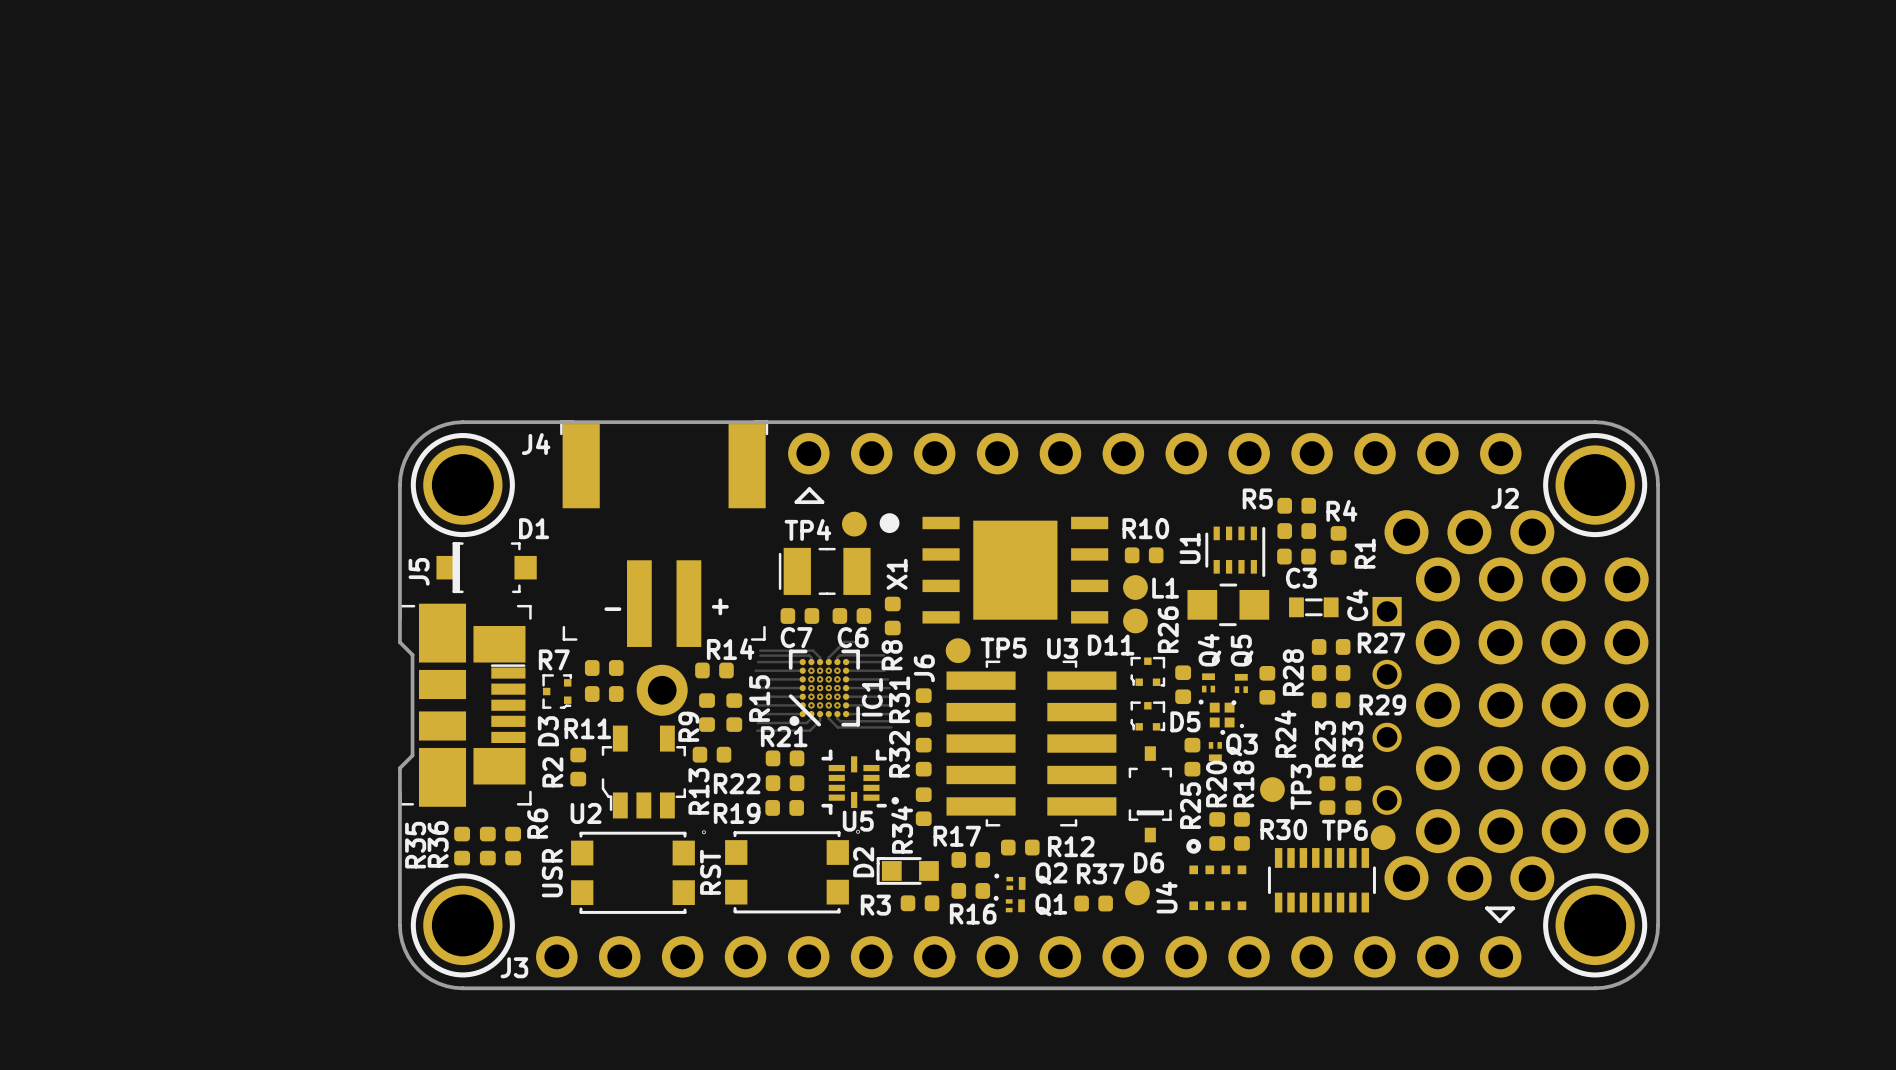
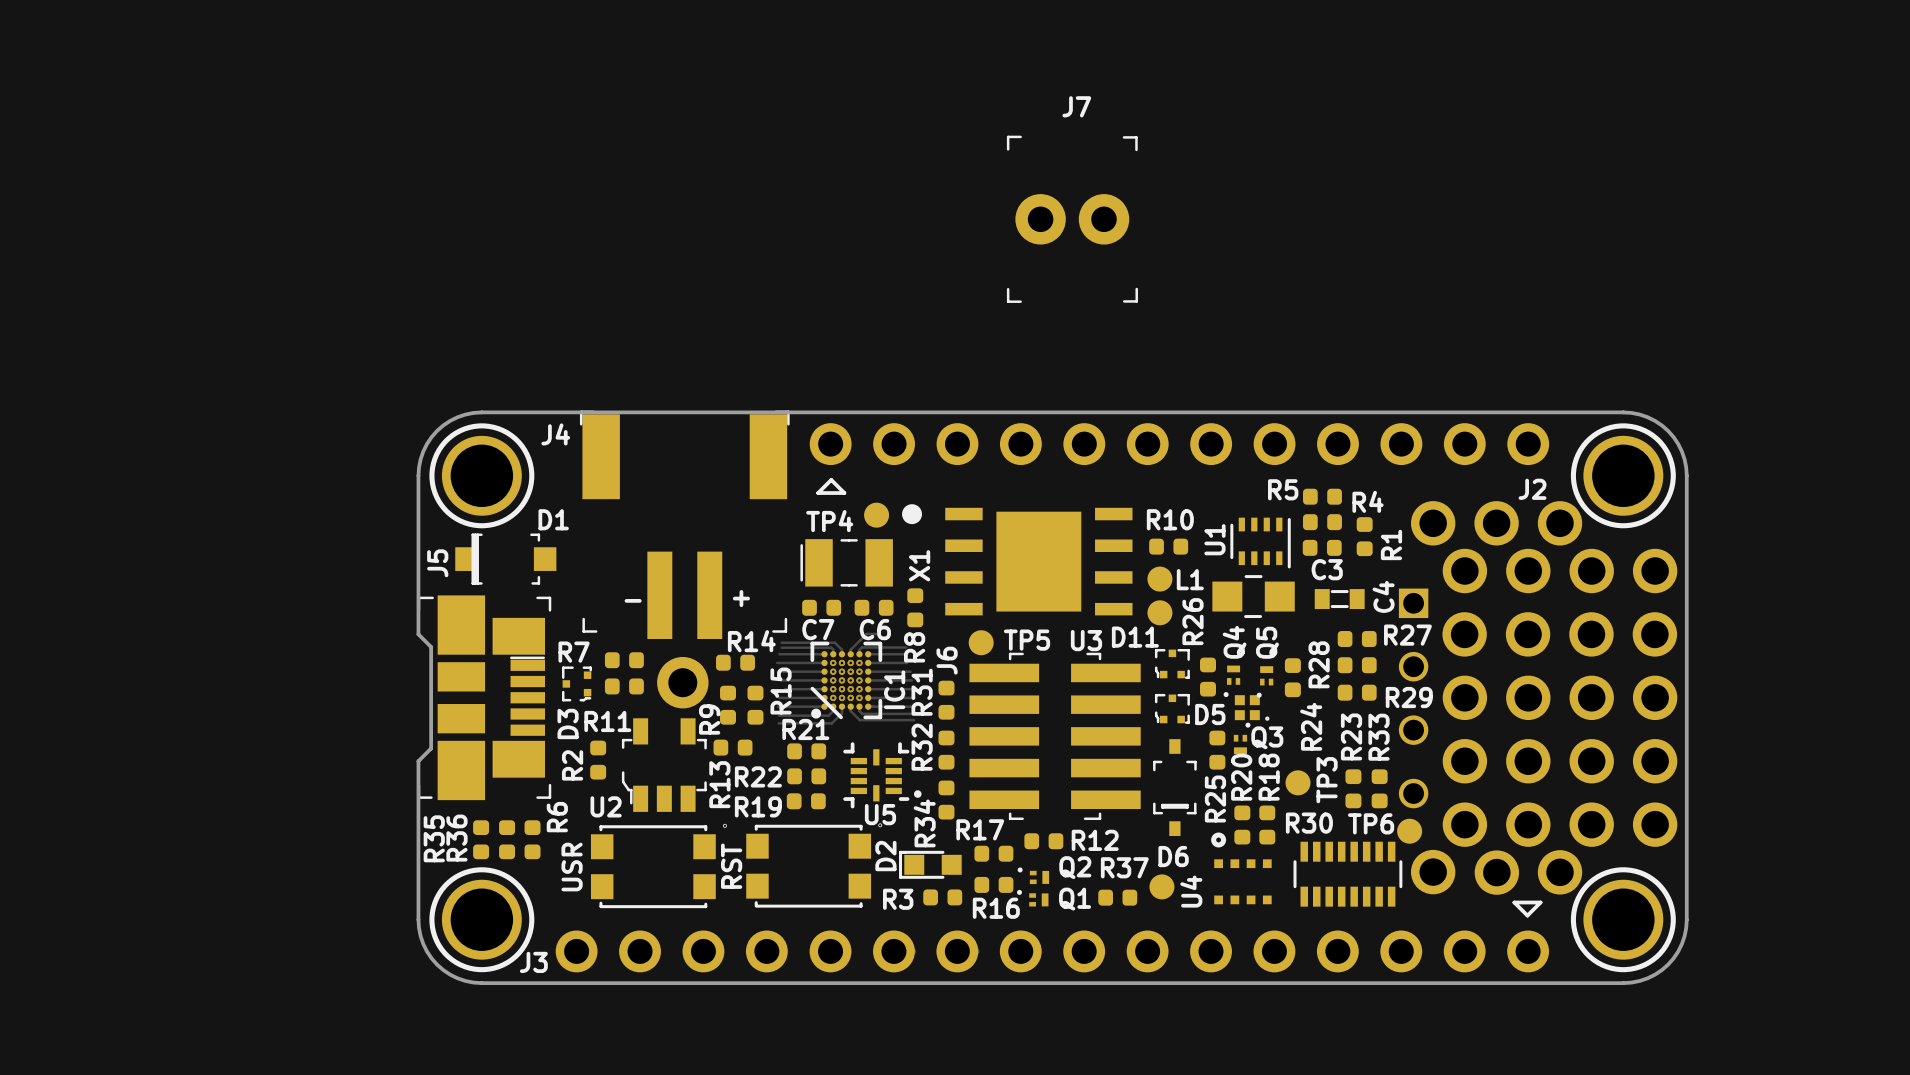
J7: none -> (1072, 219)

